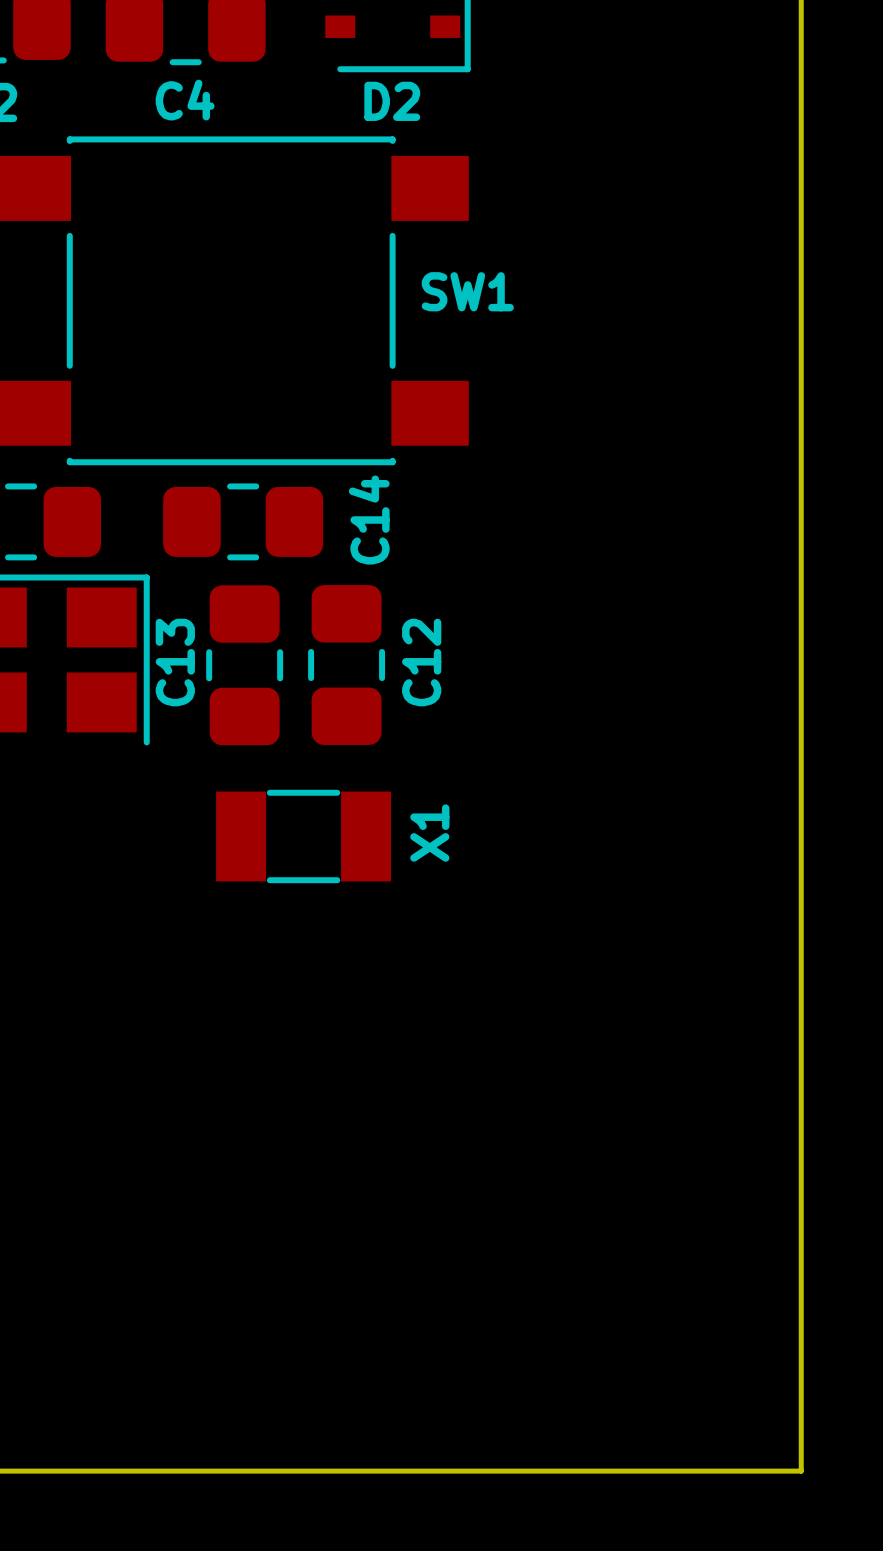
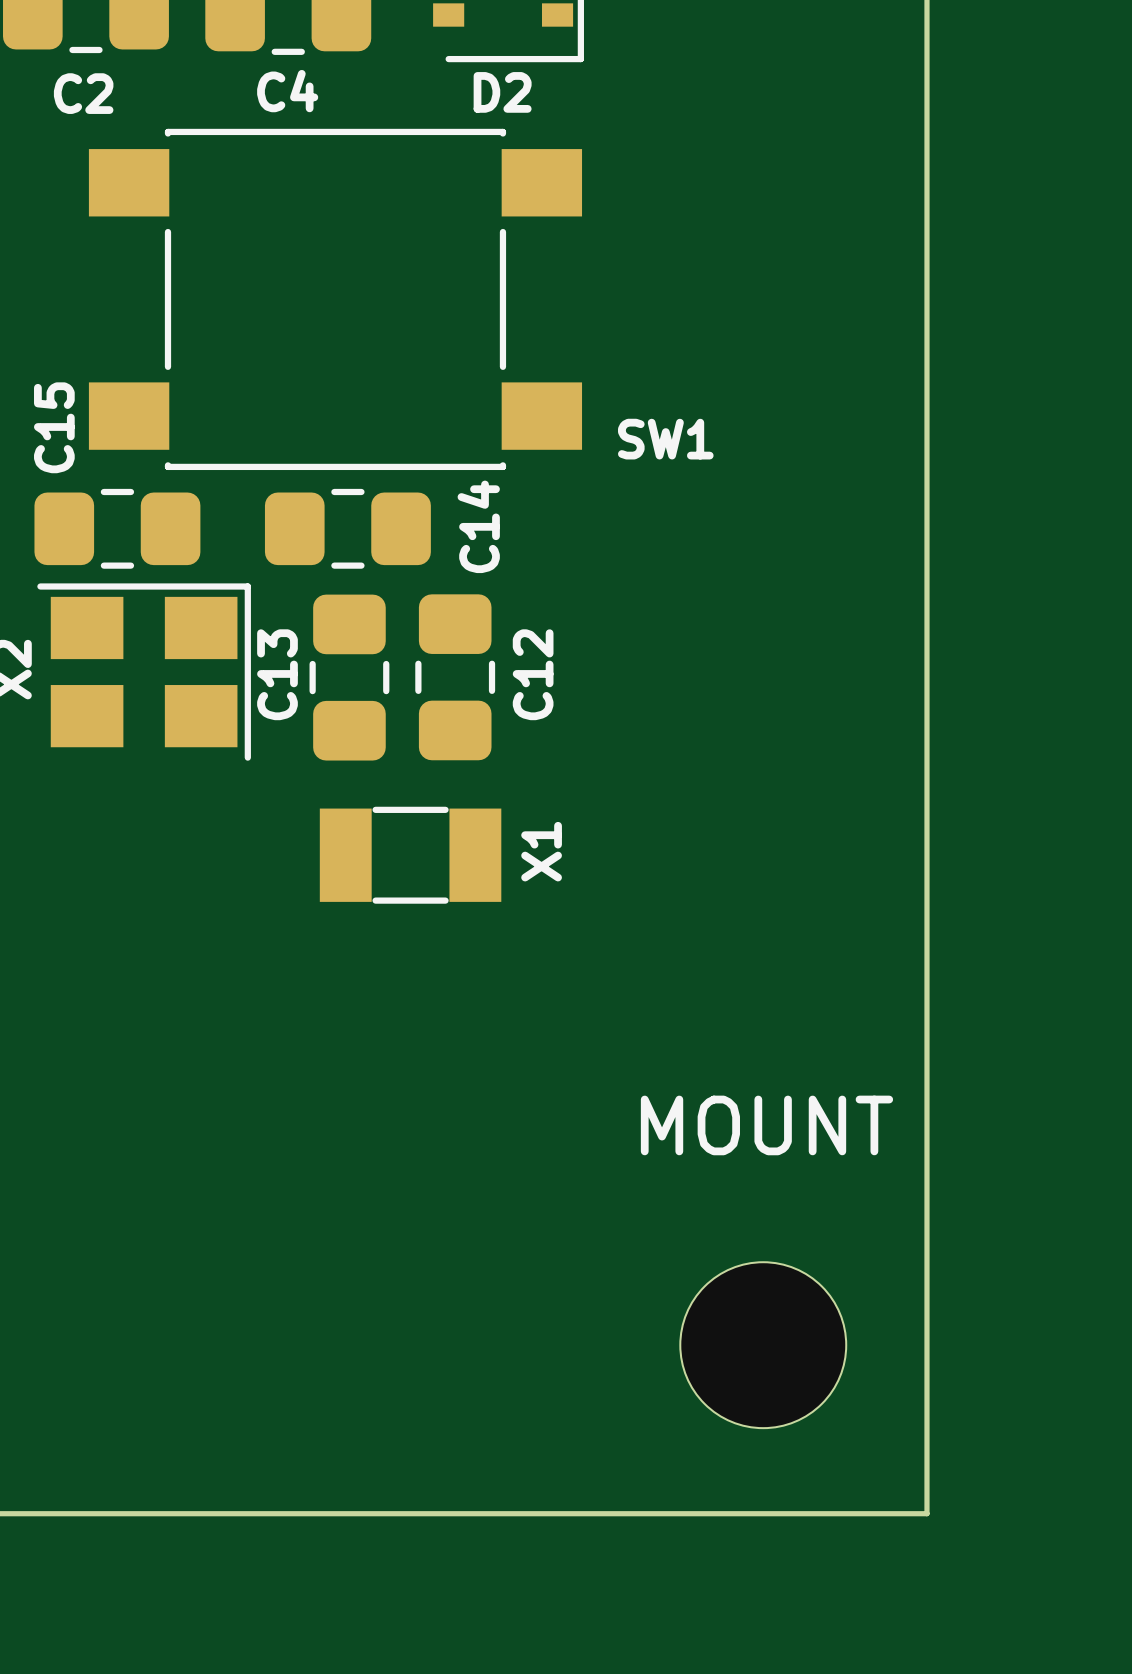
SW1 name position: SW1 (467, 291) -> SW1 (665, 439)
MOUNT: none -> (763, 1345)

